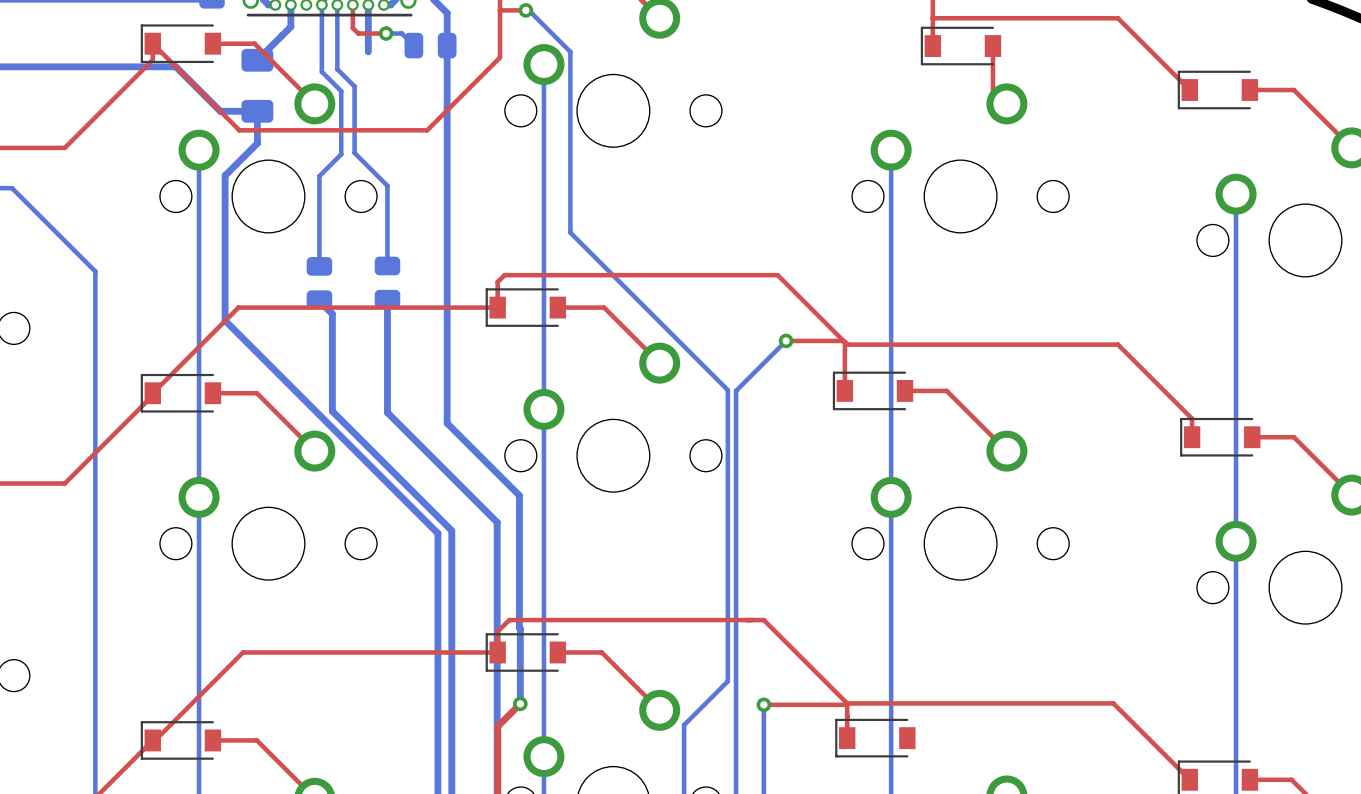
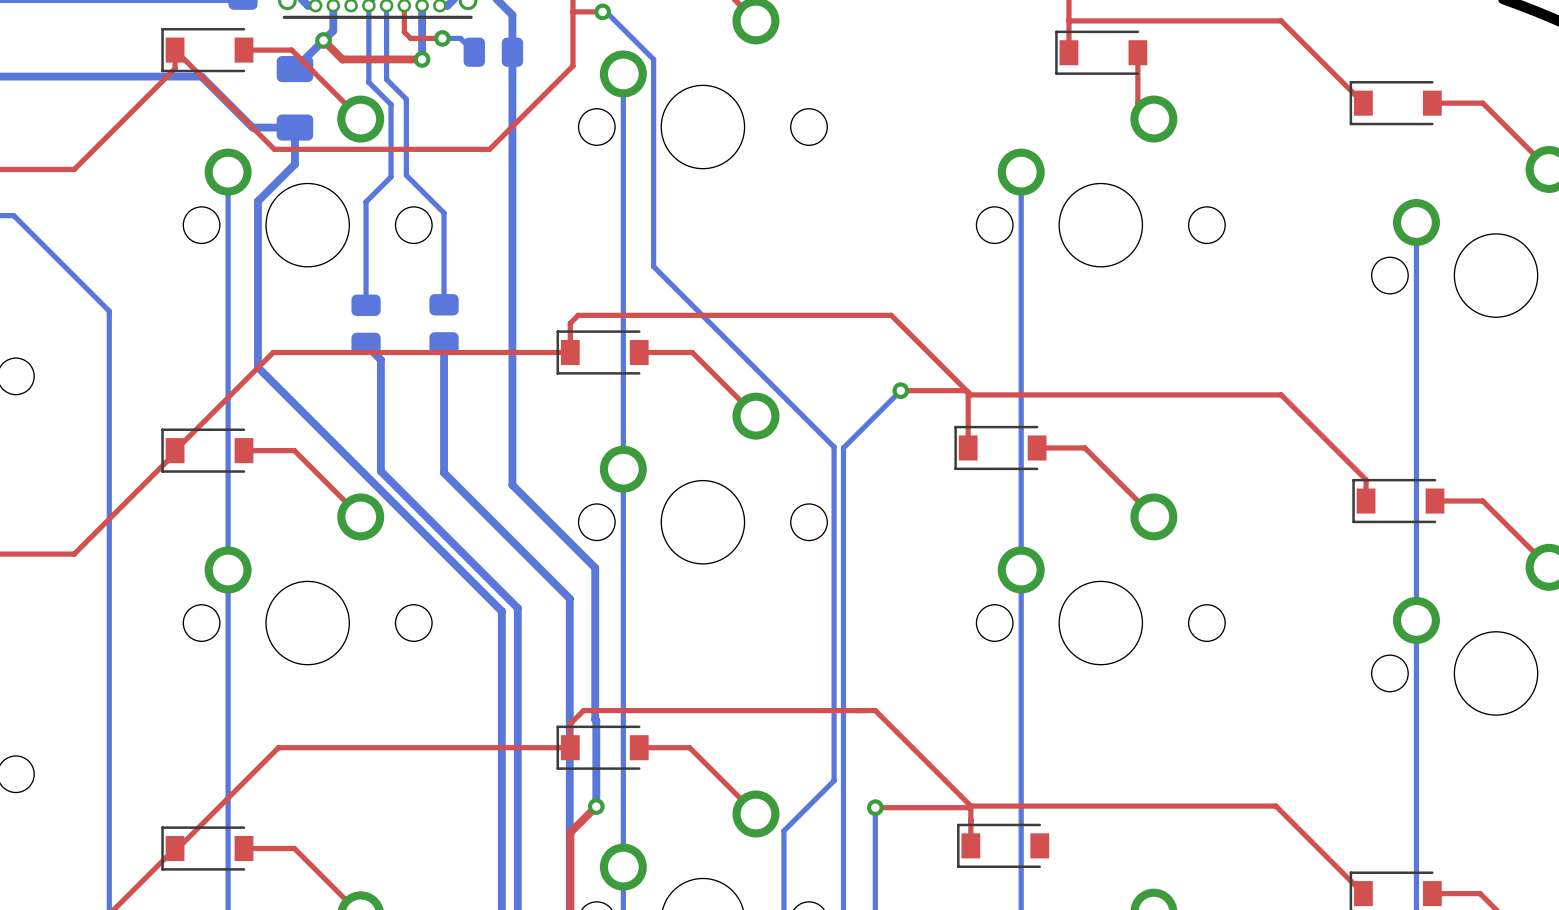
top track: none -> (323, 40) (342, 59) (422, 59)
via: none -> (323, 40)
via: none -> (422, 59)

